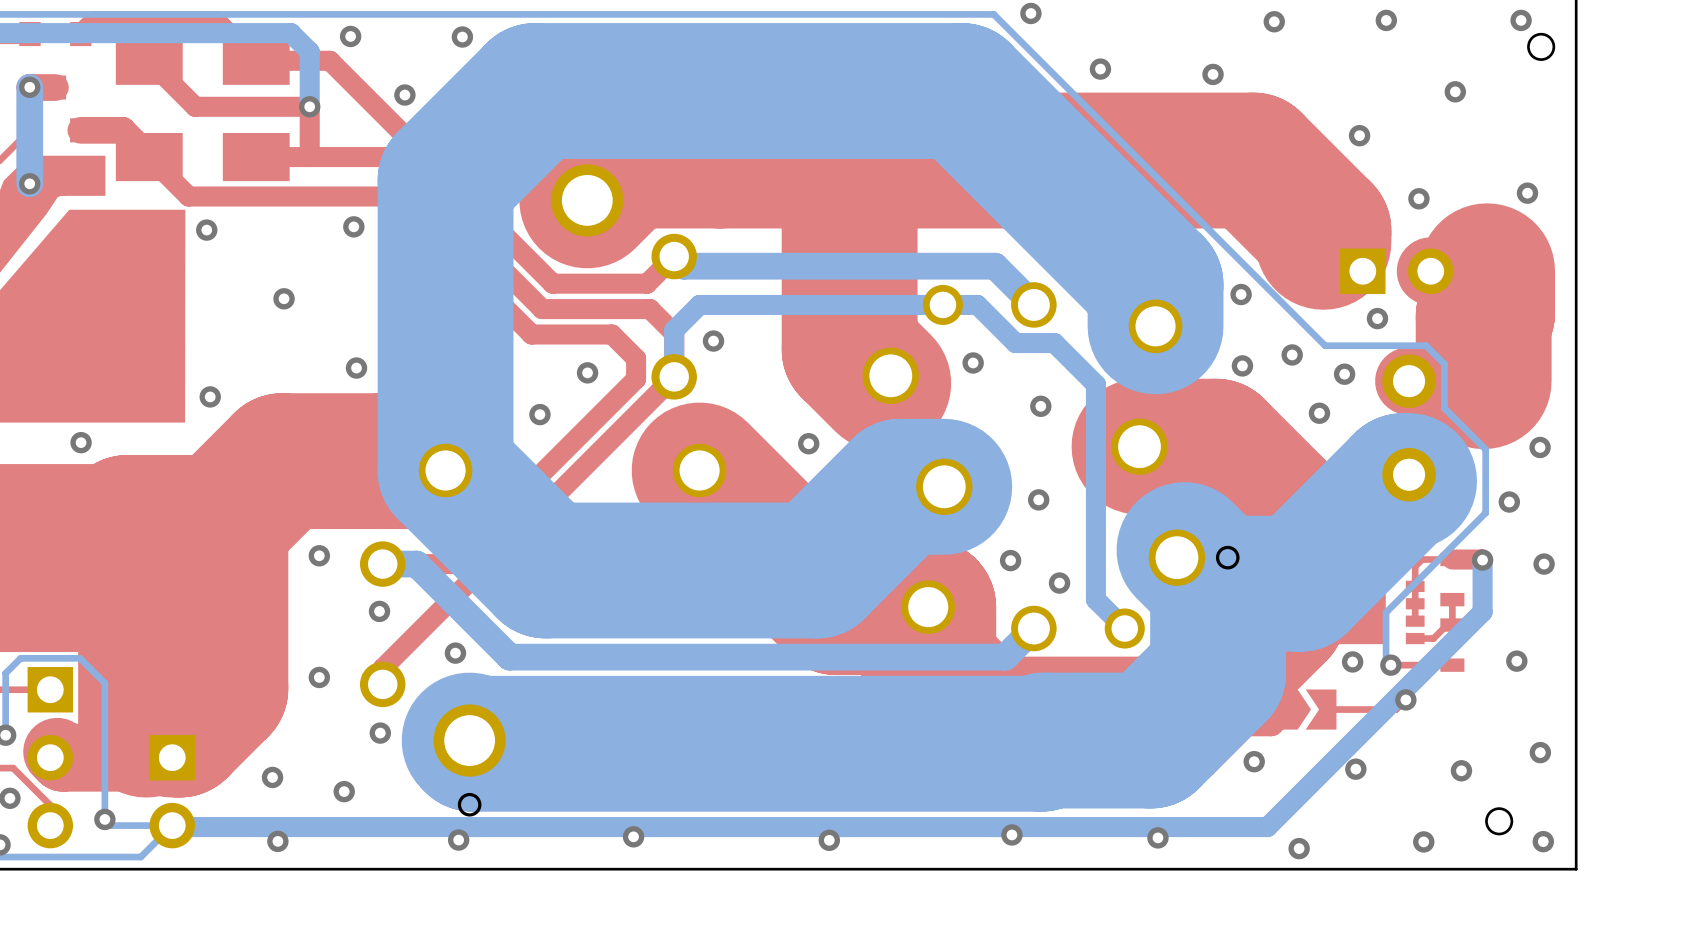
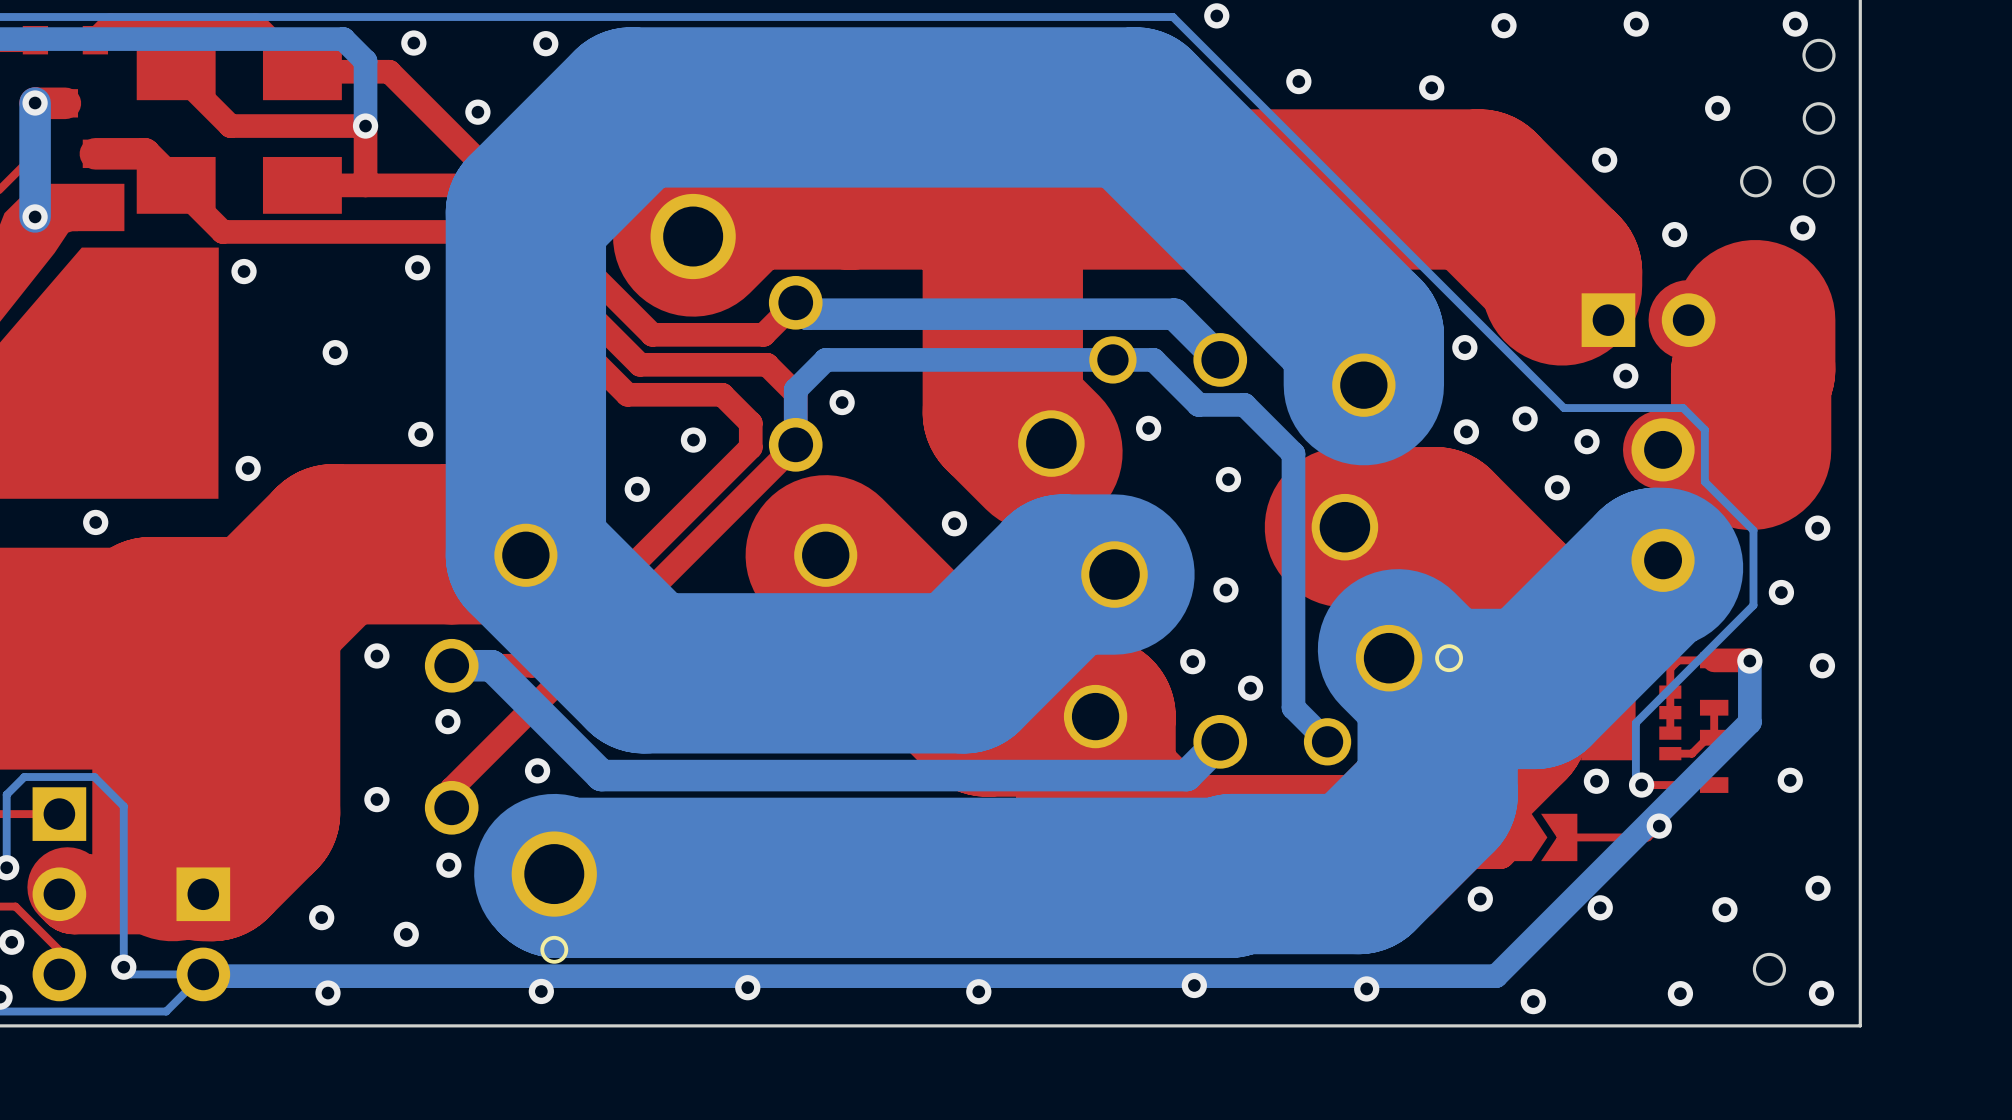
round board edge: none -> [1802, 102, 1836, 135]
round board edge: none -> [1740, 165, 1772, 198]
round board edge: none -> [1802, 165, 1836, 198]

